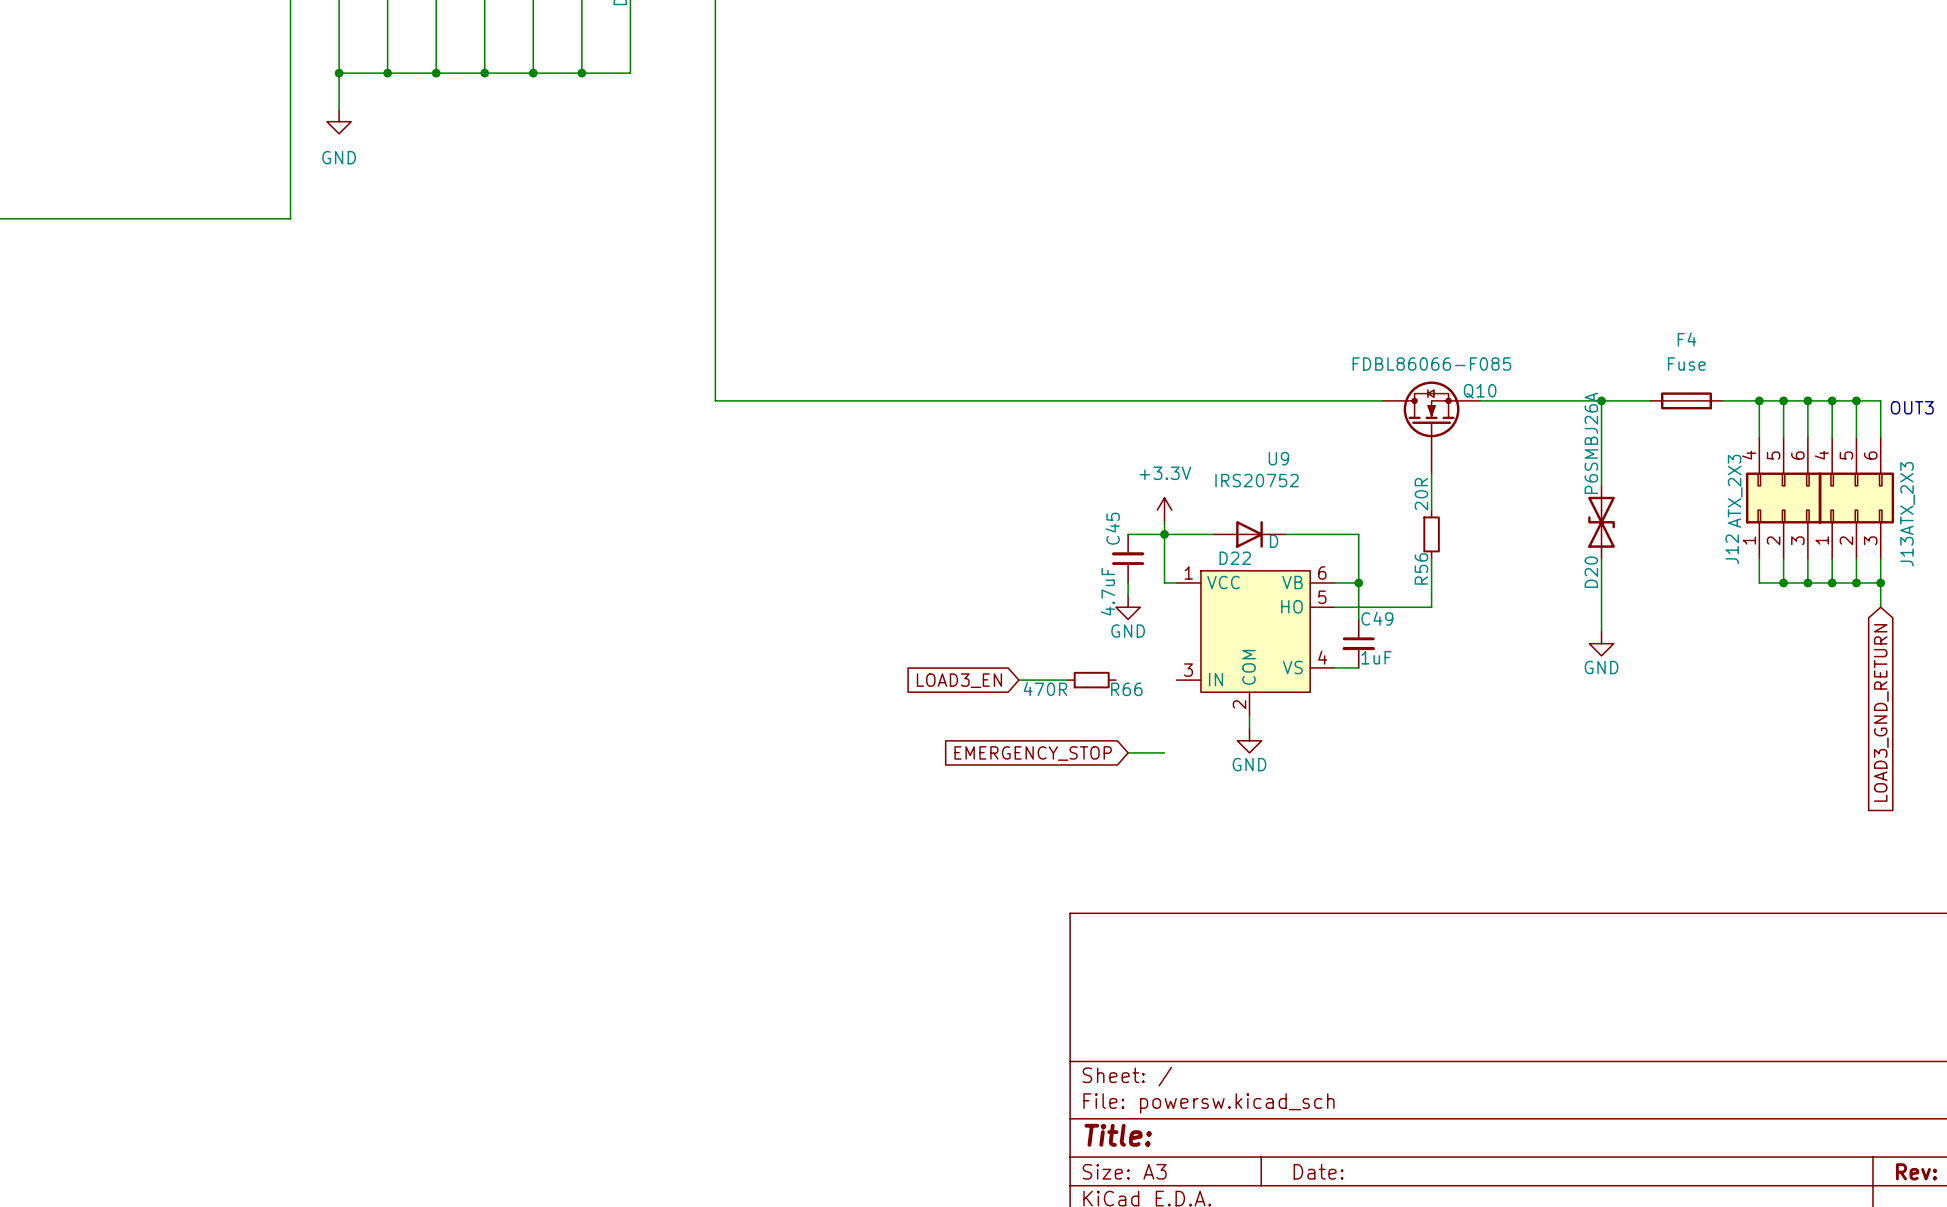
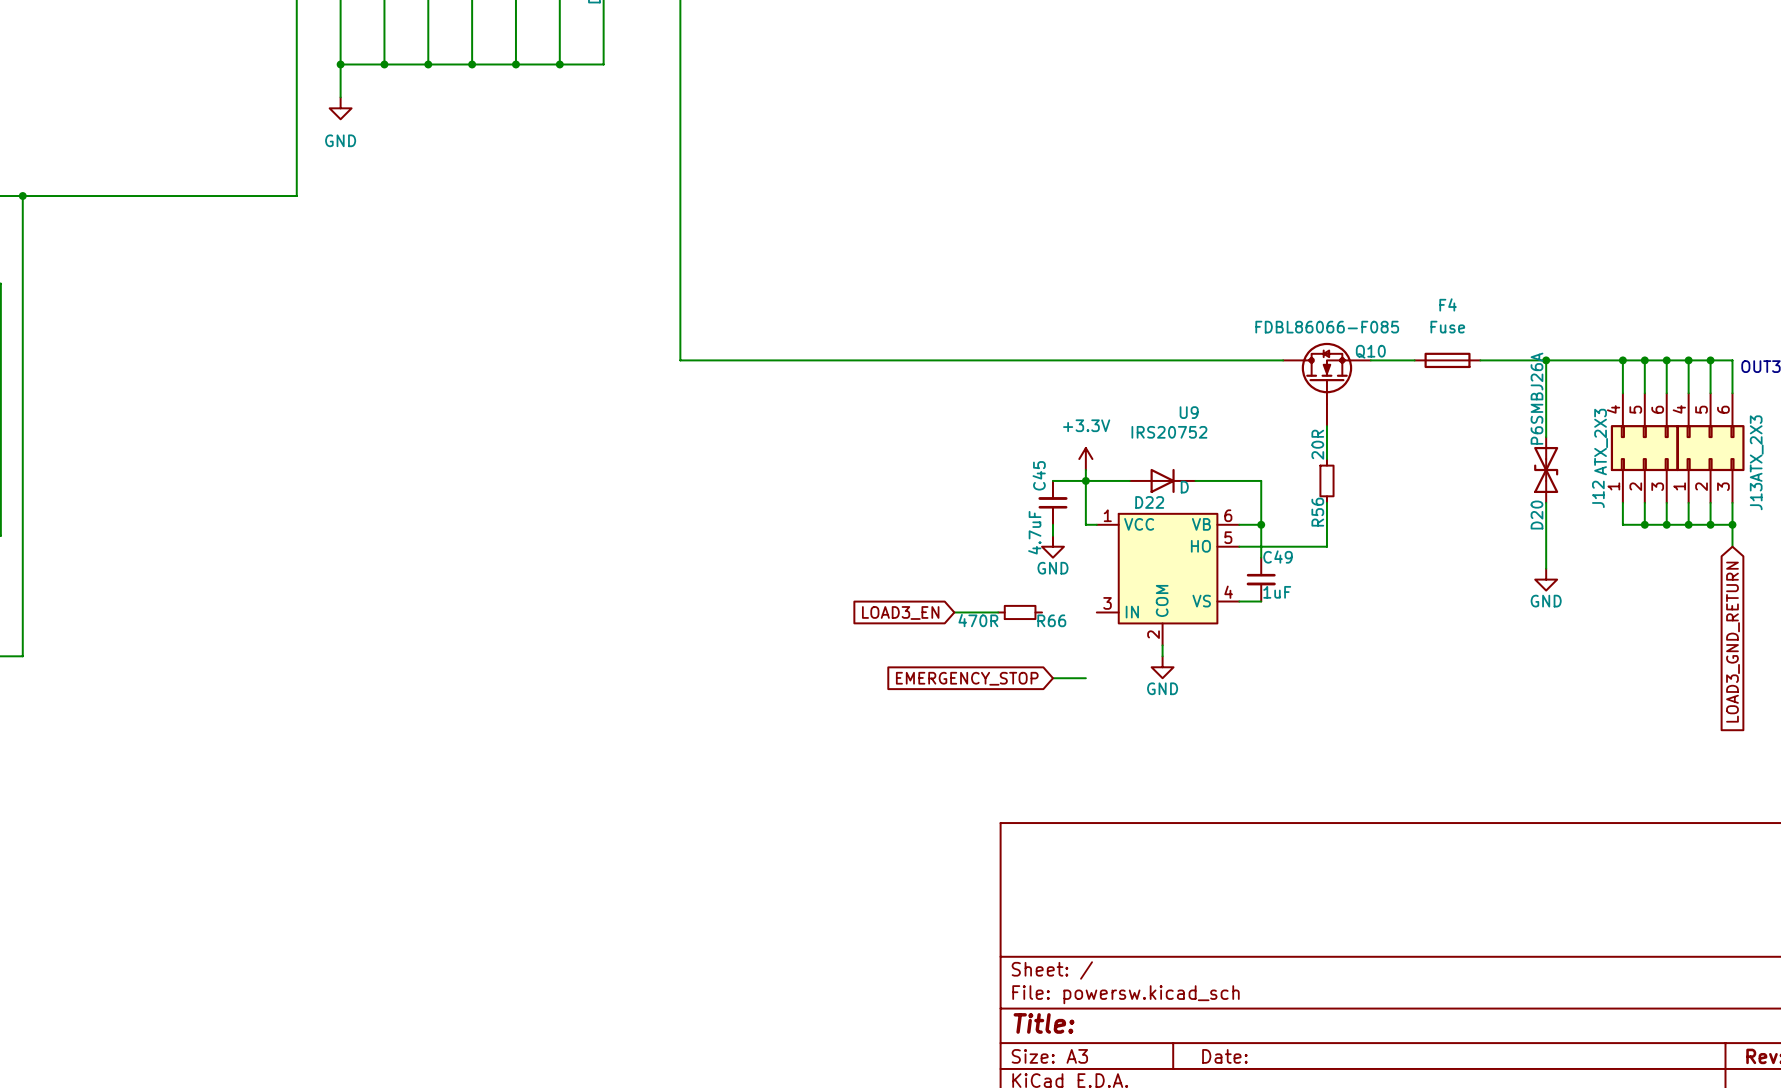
wire: (1528, 400) (1601, 400) (1601, 485) -> none
junction: (1601, 400) -> none
wire: none -> (1546, 360) (1546, 437)
junction: none -> (1546, 360)
F4 position: (1686, 400) -> (1447, 360)
D20 position: (1601, 522) -> (1546, 469)
wire: (1601, 558) (1601, 631) -> (1546, 502) (1546, 568)
power symbol position: GND (1601, 643) -> GND (1546, 579)

